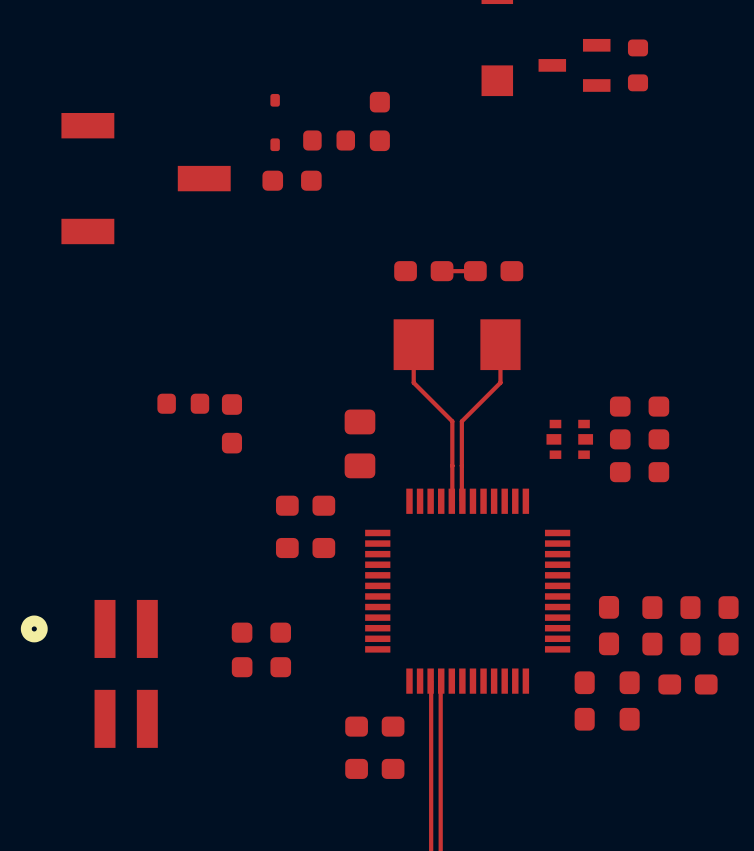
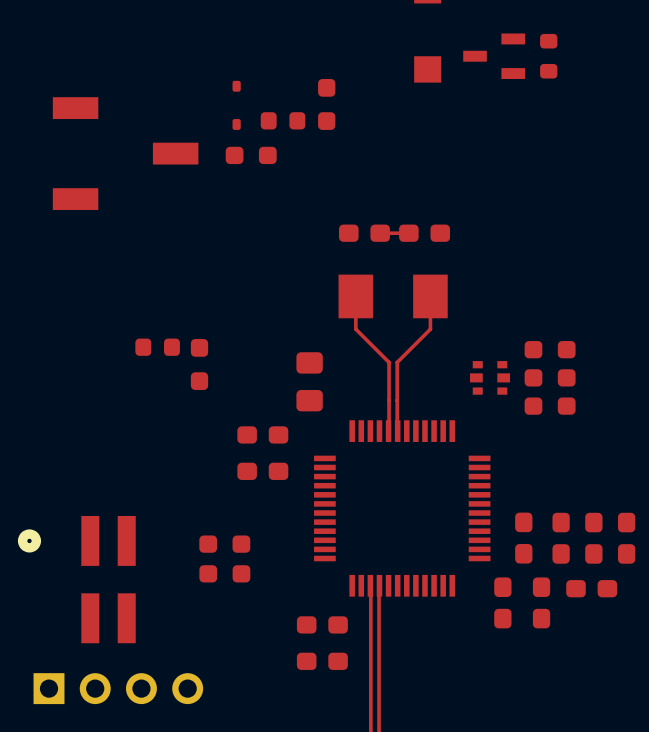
part: none -> (118, 688)

